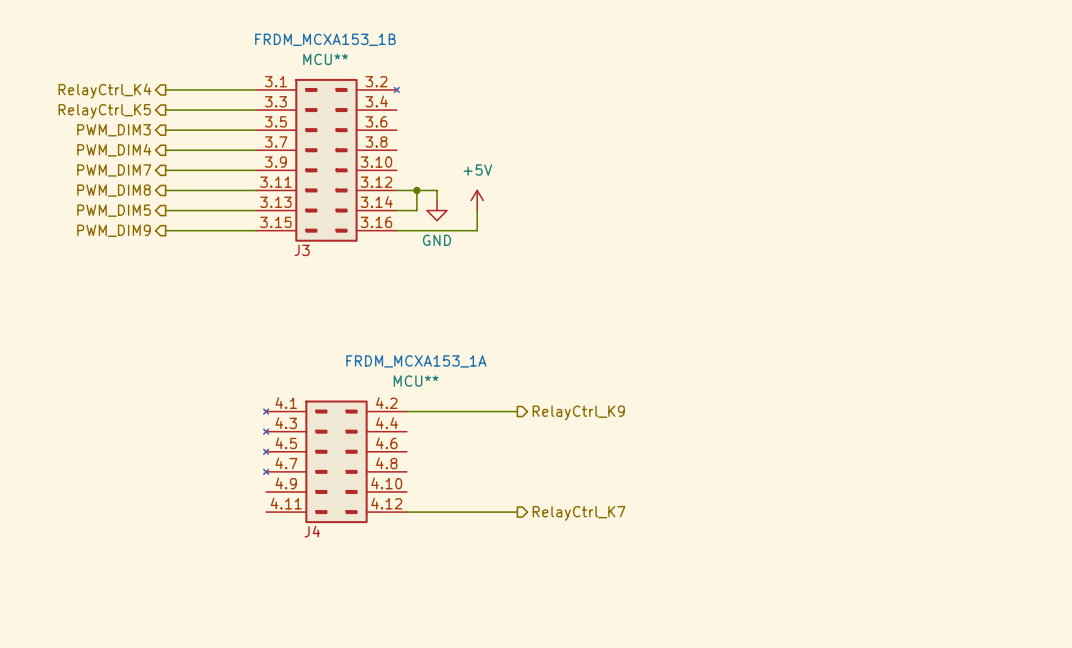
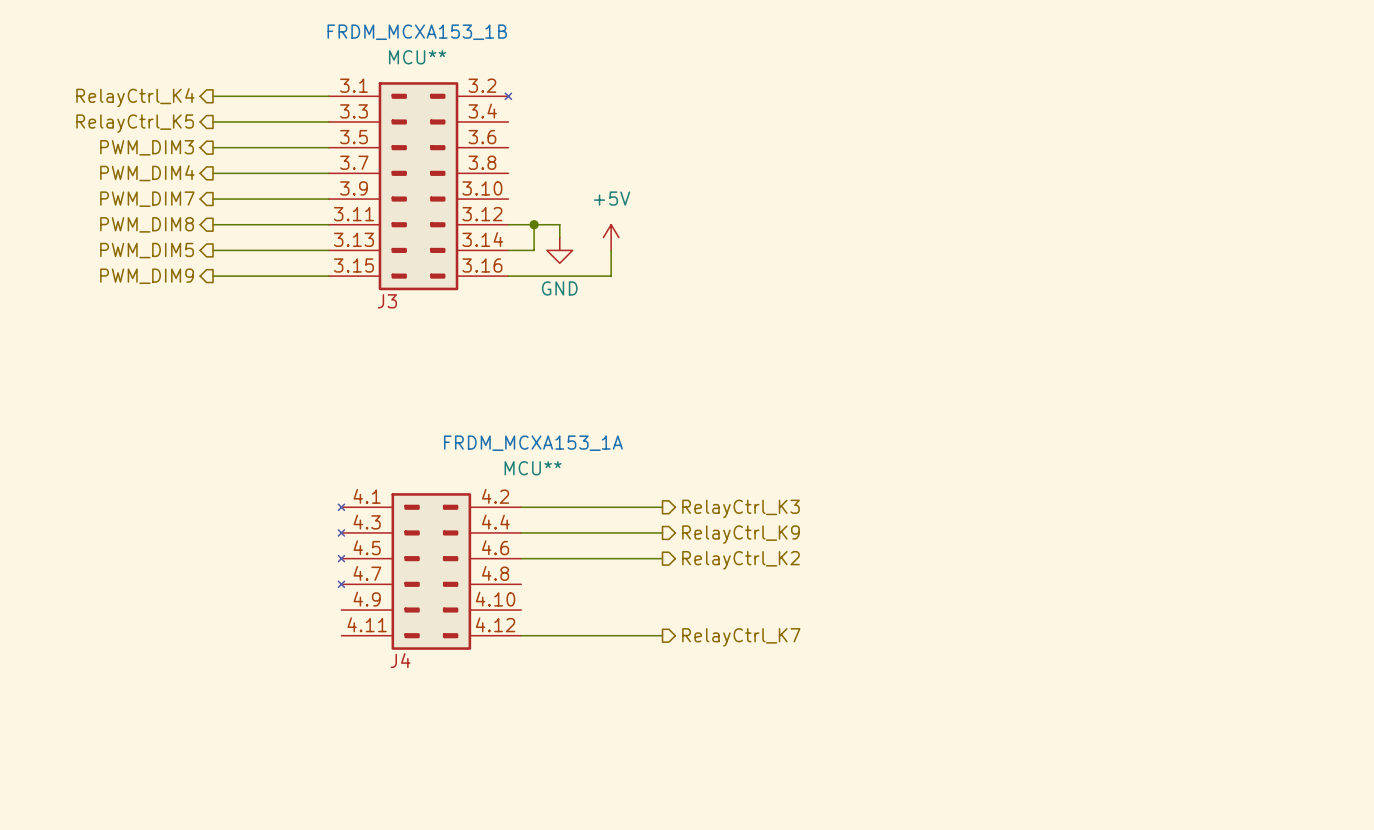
hierarchical label: RelayCtrl_K9 (578, 412) -> RelayCtrl_K3 (741, 508)
wire: none -> (521, 532) (662, 532)
hierarchical label: none -> RelayCtrl_K9 (741, 534)
wire: none -> (521, 558) (662, 558)
hierarchical label: none -> RelayCtrl_K2 (741, 560)

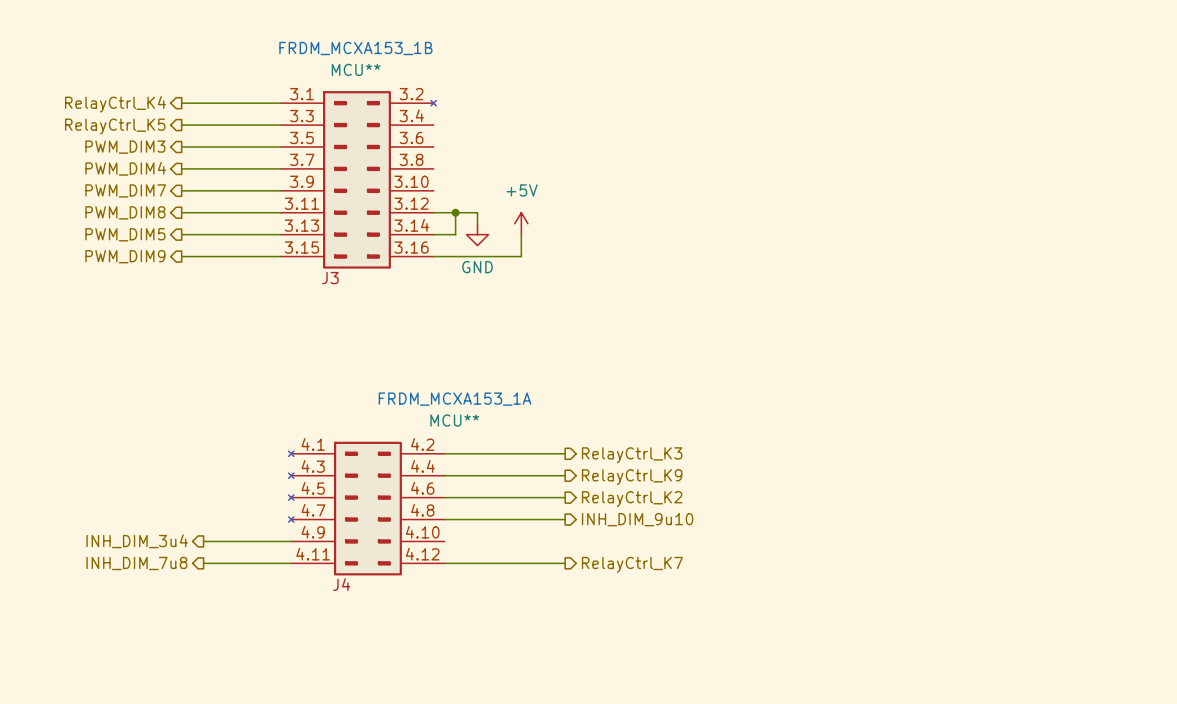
wire: none -> (444, 519) (565, 519)
hierarchical label: none -> INH_DIM_9u10 (637, 519)
hierarchical label: none -> INH_DIM_3u4 (137, 541)
wire: none -> (203, 541) (291, 541)
hierarchical label: none -> INH_DIM_7u8 (136, 563)
wire: none -> (203, 563) (291, 563)

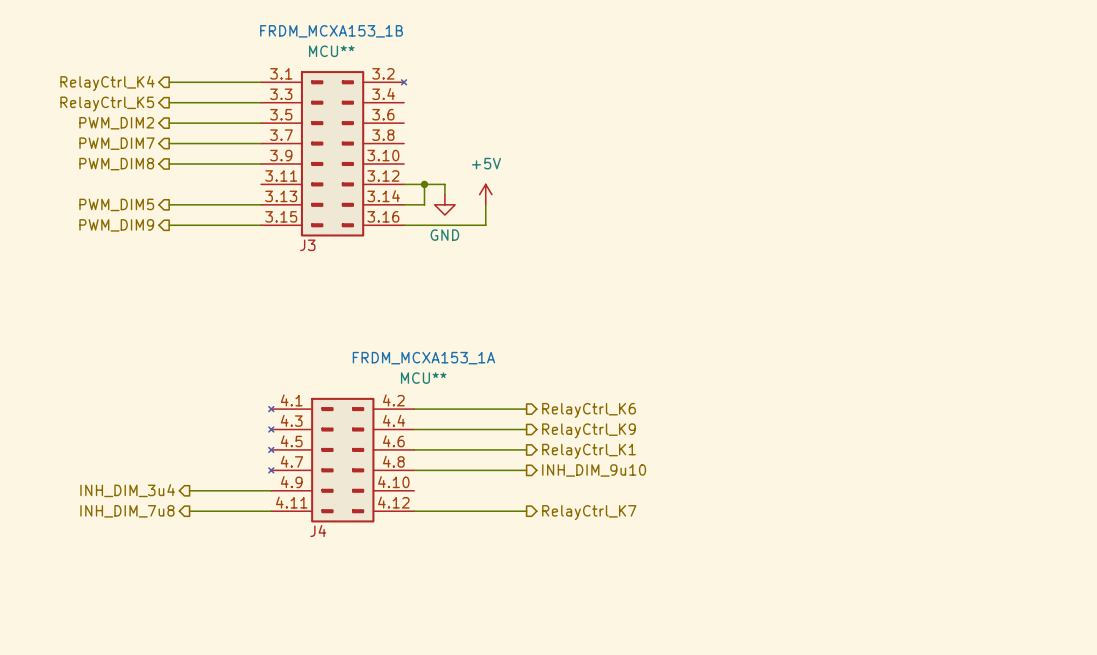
hierarchical label: PWM_DIM3 (125, 147) -> PWM_DIM2 (116, 123)
hierarchical label: PWM_DIM4 (125, 168) -> PWM_DIM7 (116, 143)
hierarchical label: PWM_DIM7 (125, 190) -> PWM_DIM8 (116, 164)
hierarchical label: PWM_DIM8 (125, 212) -> none
wire: (181, 212) (280, 212) -> none
hierarchical label: RelayCtrl_K3 (632, 455) -> RelayCtrl_K6 (589, 410)
hierarchical label: RelayCtrl_K2 (632, 499) -> RelayCtrl_K1 (589, 451)

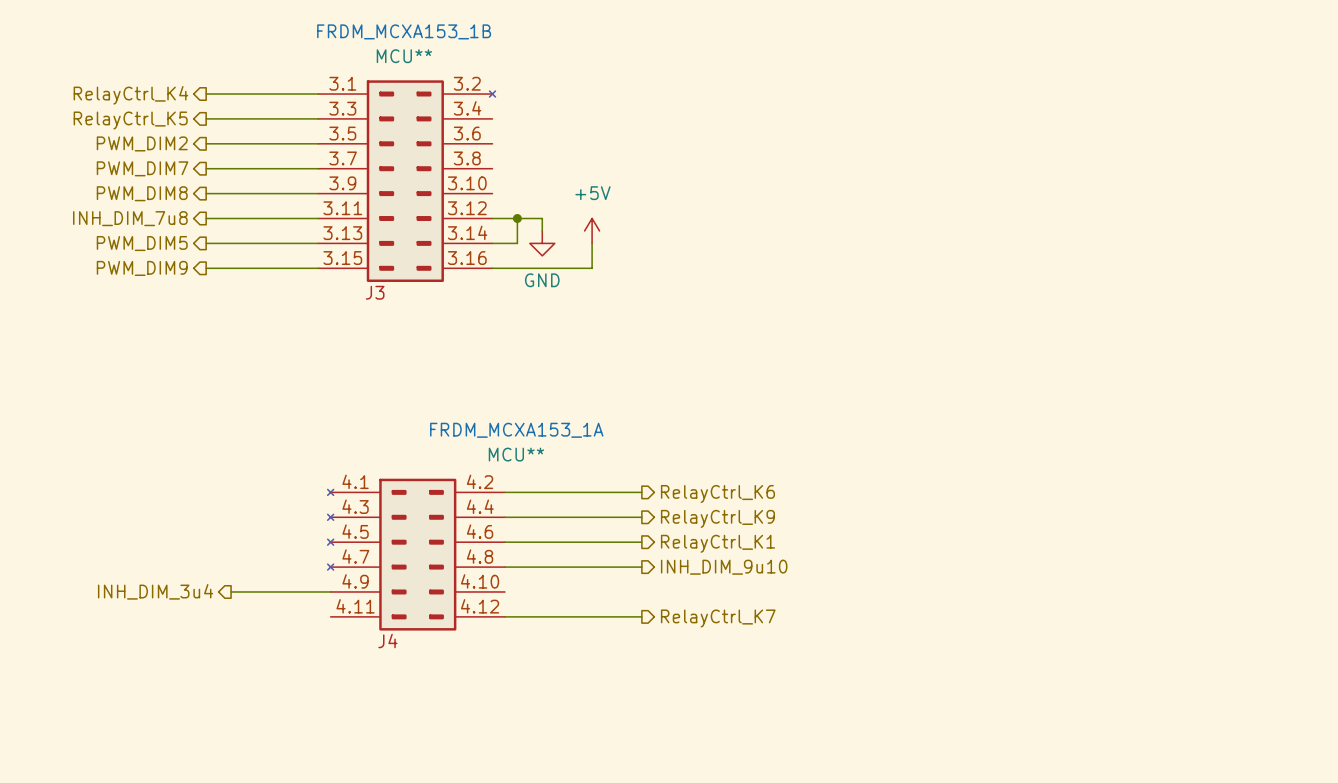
hierarchical label: none -> INH_DIM_7u8 (130, 218)
wire: none -> (206, 218) (318, 218)
hierarchical label: INH_DIM_7u8 (127, 511) -> none
wire: (189, 511) (271, 511) -> none

